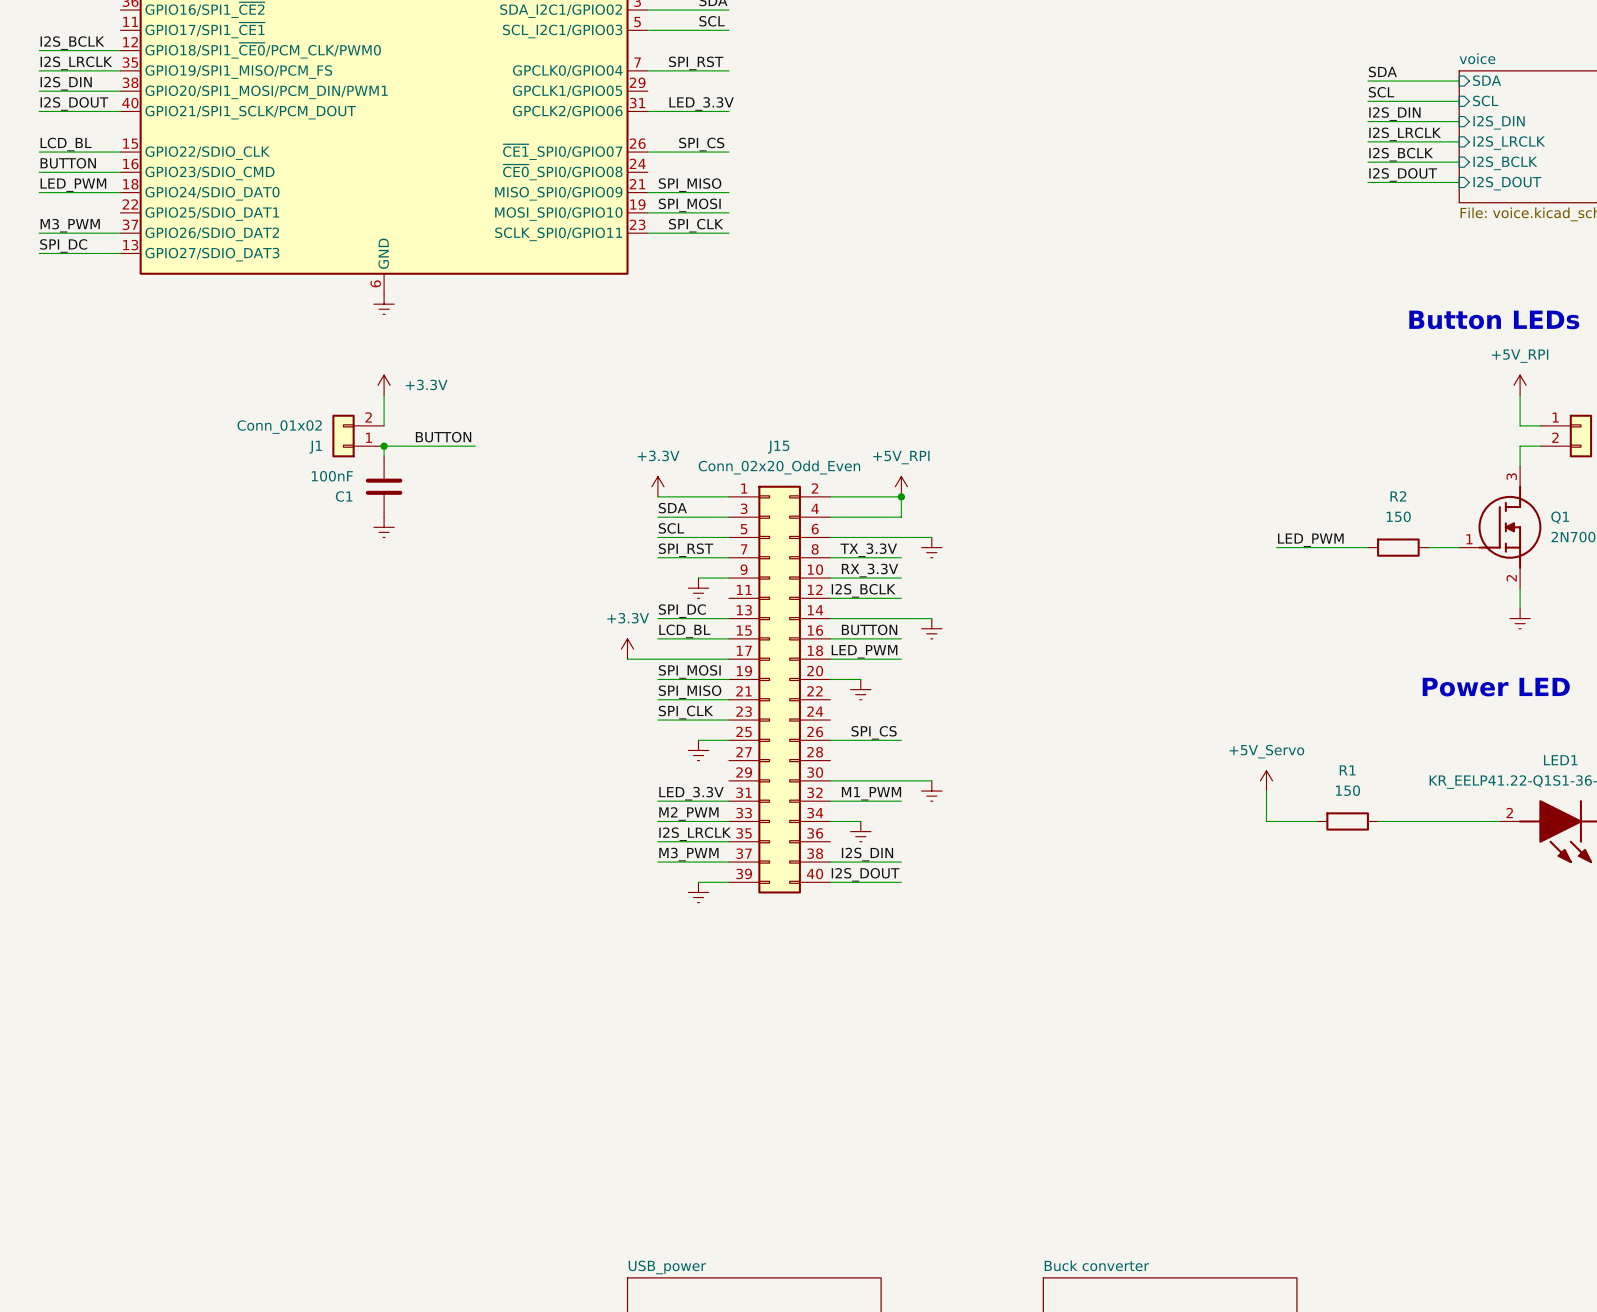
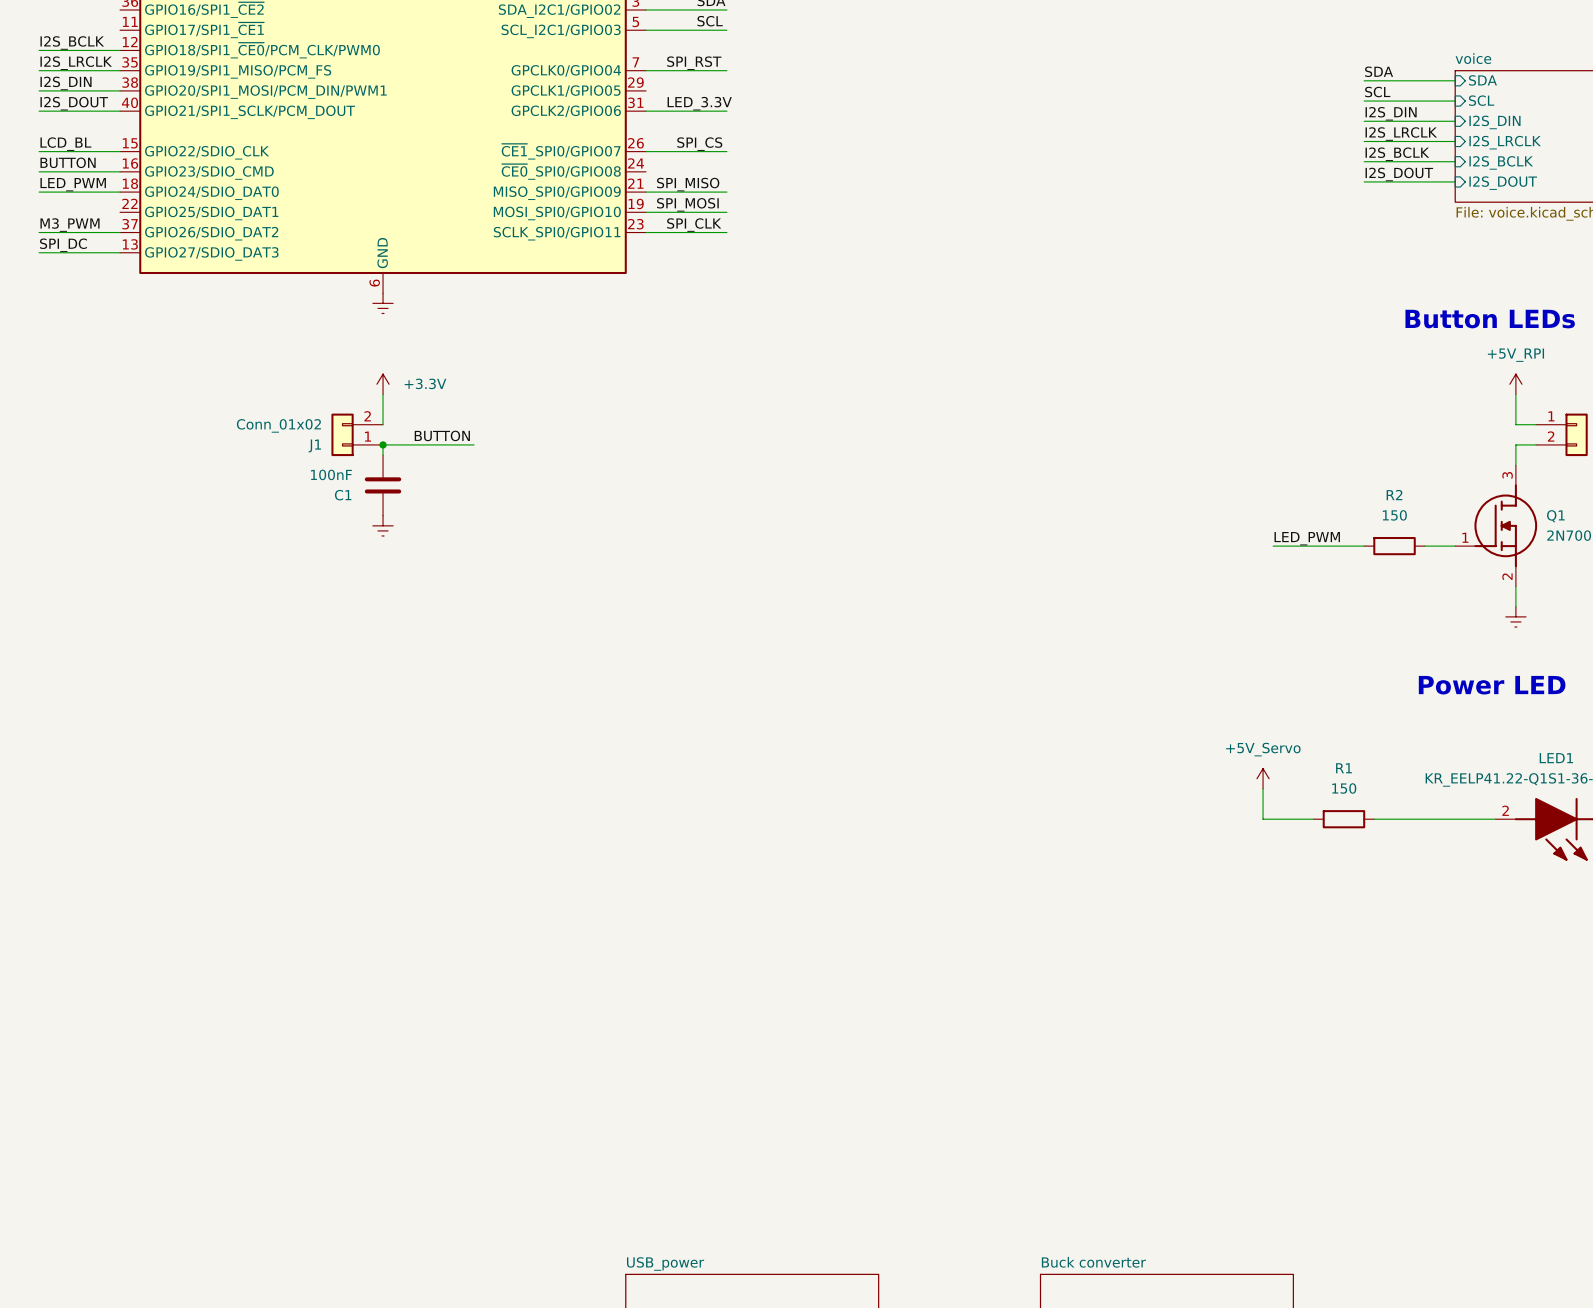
power symbol: +3.3V (657, 486) -> none
power symbol: +5V_RPI (901, 486) -> none
wire: (657, 496) (728, 496) -> none
wire: (830, 496) (901, 496) (901, 517) (830, 517) -> none
junction: (901, 496) -> none
label: SDA (672, 508) -> none
wire: (657, 517) (728, 517) -> none
label: SCL (671, 528) -> none
wire: (657, 537) (728, 537) -> none
wire: (830, 537) (931, 537) -> none
power symbol: (931, 547) -> none
label: SPI_RST (686, 550) -> none
label: TX_3.3V (868, 550) -> none
wire: (657, 557) (728, 557) -> none
wire: (830, 557) (901, 557) -> none
label: RX_3.3V (870, 570) -> none
wire: (698, 578) (728, 578) -> none
wire: (830, 578) (901, 578) -> none
power symbol: (698, 588) -> none
label: I2S_BCLK (863, 590) -> none
wire: (830, 598) (901, 598) -> none
label: SPI_DC (682, 611) -> none
wire: (657, 618) (728, 618) -> none
wire: (830, 618) (931, 618) -> none
power symbol: (931, 628) -> none
label: BUTTON (869, 629) -> none
label: LCD_BL (684, 631) -> none
wire: (657, 638) (728, 638) -> none
wire: (830, 638) (901, 638) -> none
power symbol: +3.3V (627, 649) -> none
label: LED_PWM (864, 651) -> none
wire: (627, 659) (728, 659) -> none
wire: (830, 659) (901, 659) -> none
label: SPI_MOSI (689, 671) -> none
wire: (657, 679) (728, 679) -> none
wire: (830, 679) (860, 679) -> none
J15: Conn_02x20_Odd_Even (779, 689) -> none
power symbol: (860, 689) -> none
label: SPI_MISO (690, 692) -> none
wire: (657, 699) (728, 699) -> none
label: SPI_CLK (685, 712) -> none
wire: (657, 720) (728, 720) -> none
label: SPI_CS (874, 732) -> none
wire: (698, 740) (728, 740) -> none
wire: (830, 740) (901, 740) -> none
power symbol: (698, 750) -> none
wire: (830, 780) (931, 780) -> none
power symbol: (931, 791) -> none
label: LED_3.3V (691, 793) -> none
label: M1_PWM (871, 793) -> none
wire: (657, 801) (728, 801) -> none
wire: (830, 801) (901, 801) -> none
label: M2_PWM (688, 813) -> none
wire: (657, 821) (728, 821) -> none
wire: (830, 821) (860, 821) -> none
power symbol: (860, 831) -> none
label: I2S_LRCLK (695, 834) -> none
wire: (657, 841) (728, 841) -> none
label: M3_PWM (688, 854) -> none
label: I2S_DIN (867, 854) -> none
wire: (657, 862) (728, 862) -> none
wire: (830, 862) (901, 862) -> none
label: I2S_DOUT (865, 874) -> none
wire: (698, 882) (728, 882) -> none
wire: (830, 882) (901, 882) -> none
power symbol: (698, 892) -> none

